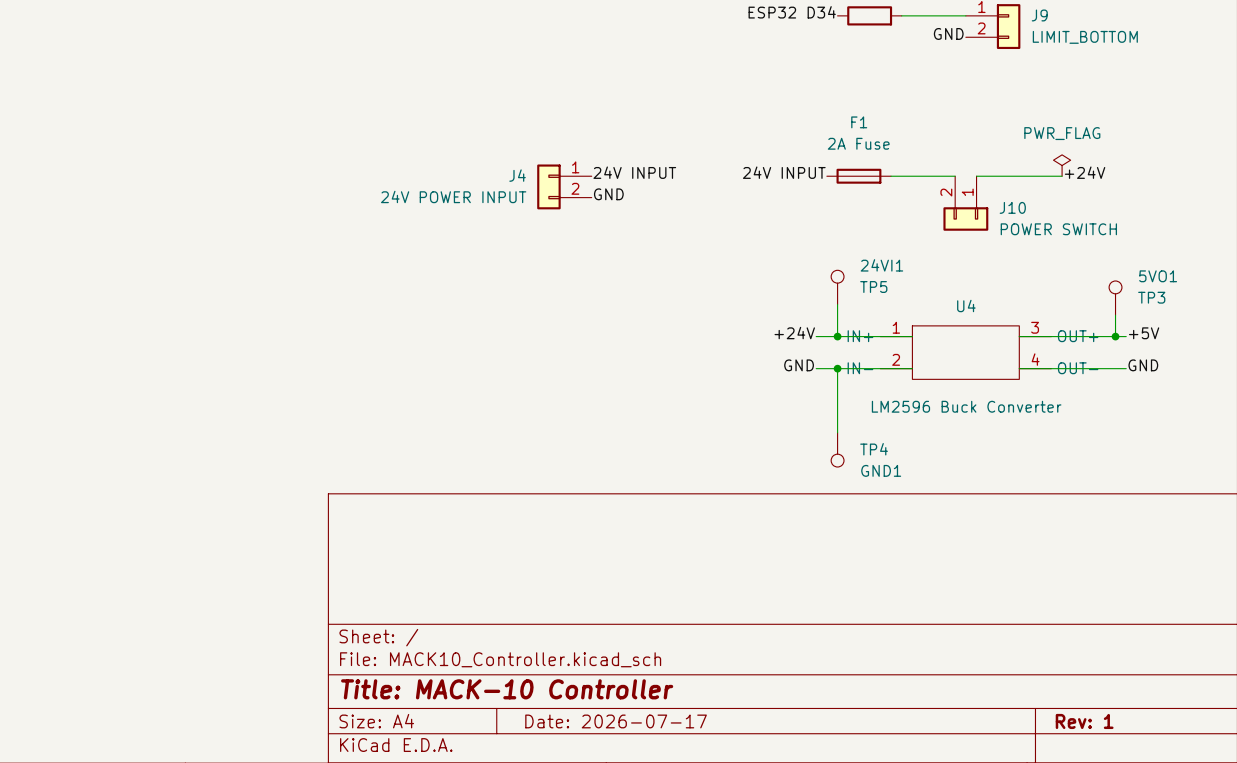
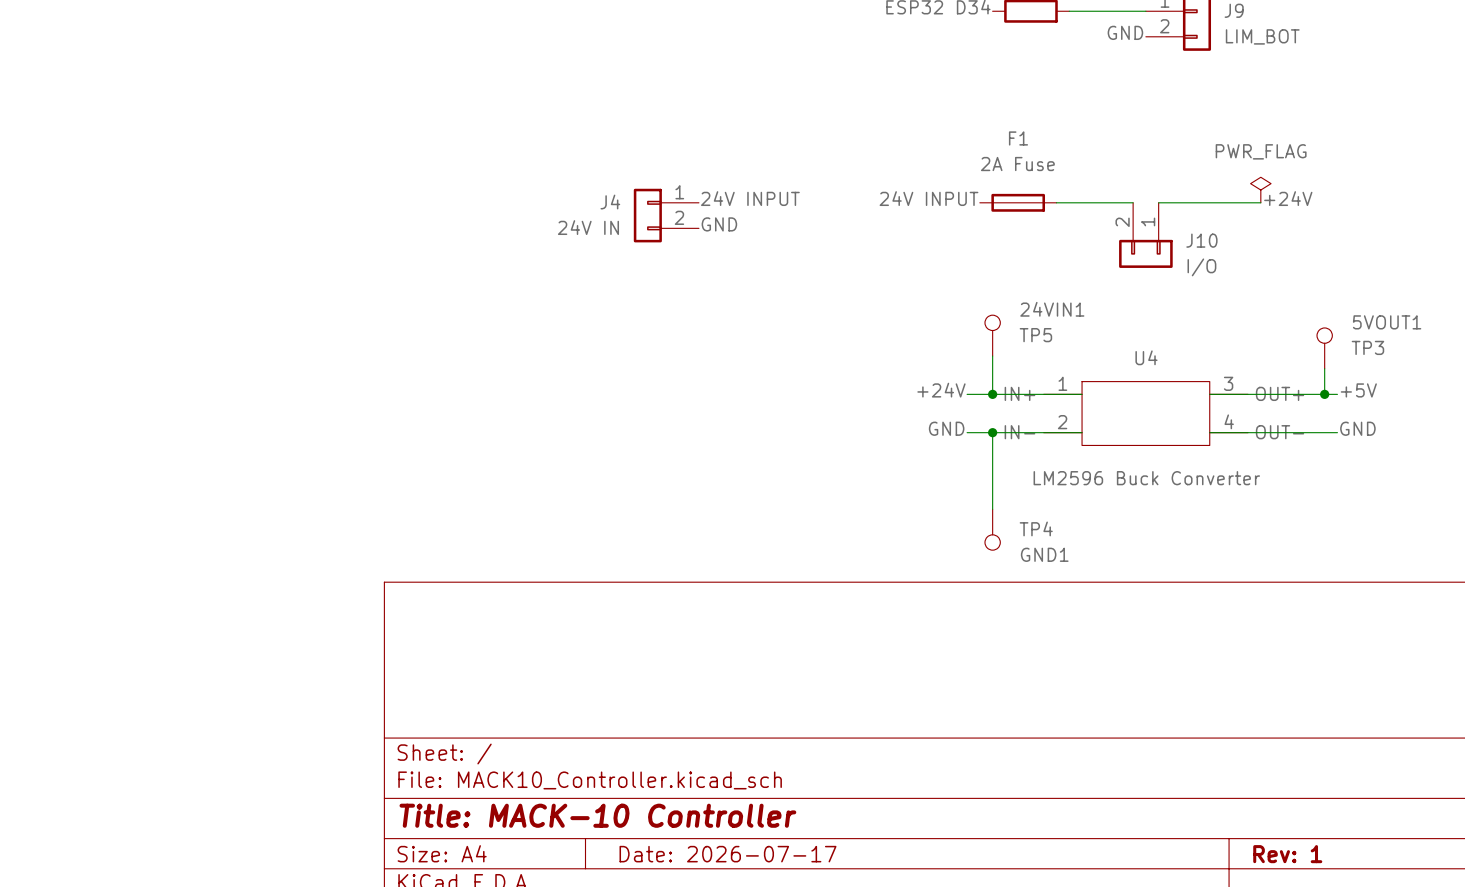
J9 value: LIMIT_BOTTOM (1085, 37) -> LIM_BOT (1262, 36)
J4 value: 24V POWER INPUT (453, 196) -> 24V IN (588, 227)
J10 value: POWER SWITCH (1058, 229) -> I/O (1201, 267)
24VI1 name: 24VI1 (881, 265) -> 24VIN1 (1052, 309)
5VO1 name: 5VO1 (1158, 276) -> 5VOUT1 (1387, 322)

